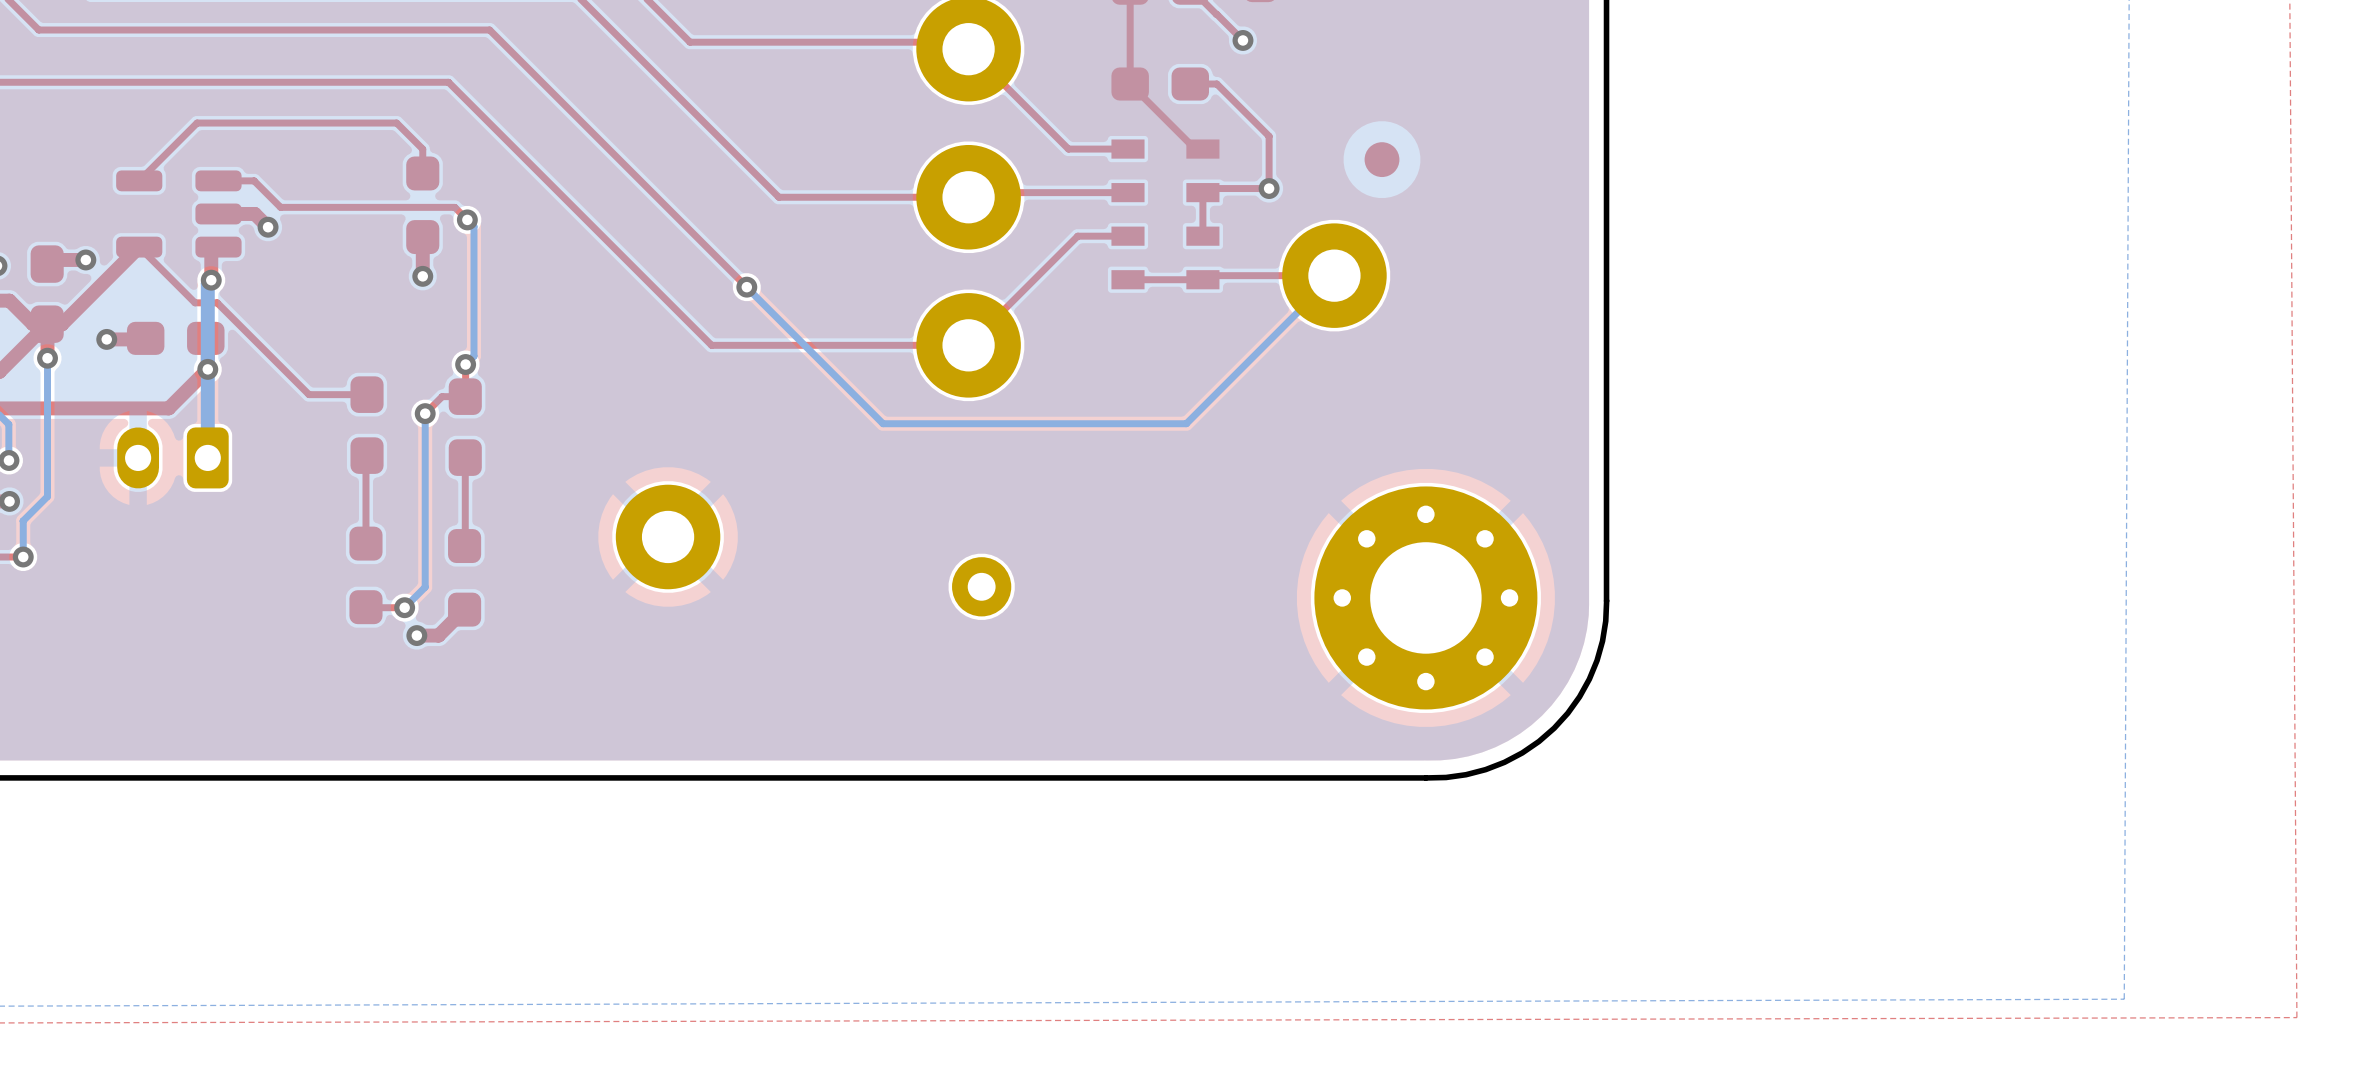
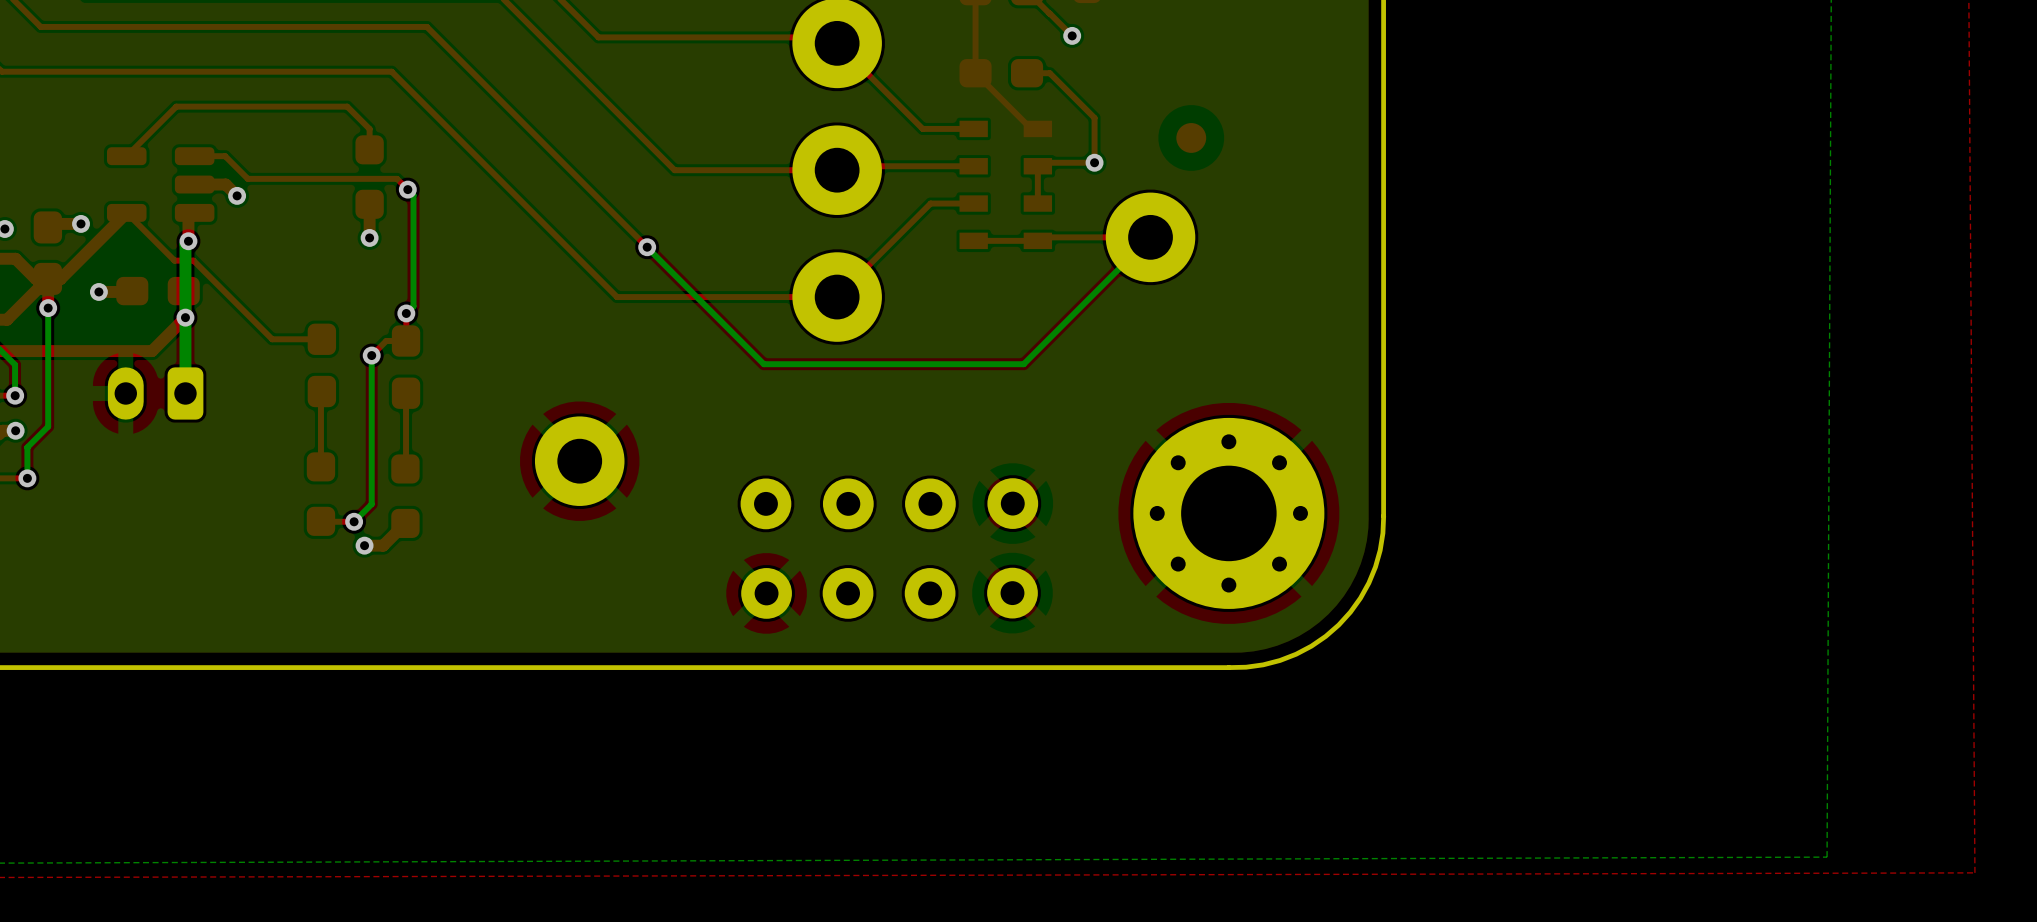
part: none -> (765, 503)
part: none -> (930, 503)
part: none -> (1012, 503)
part: none -> (1012, 593)
part: none -> (766, 593)
part: none -> (848, 593)
part: none -> (930, 593)

